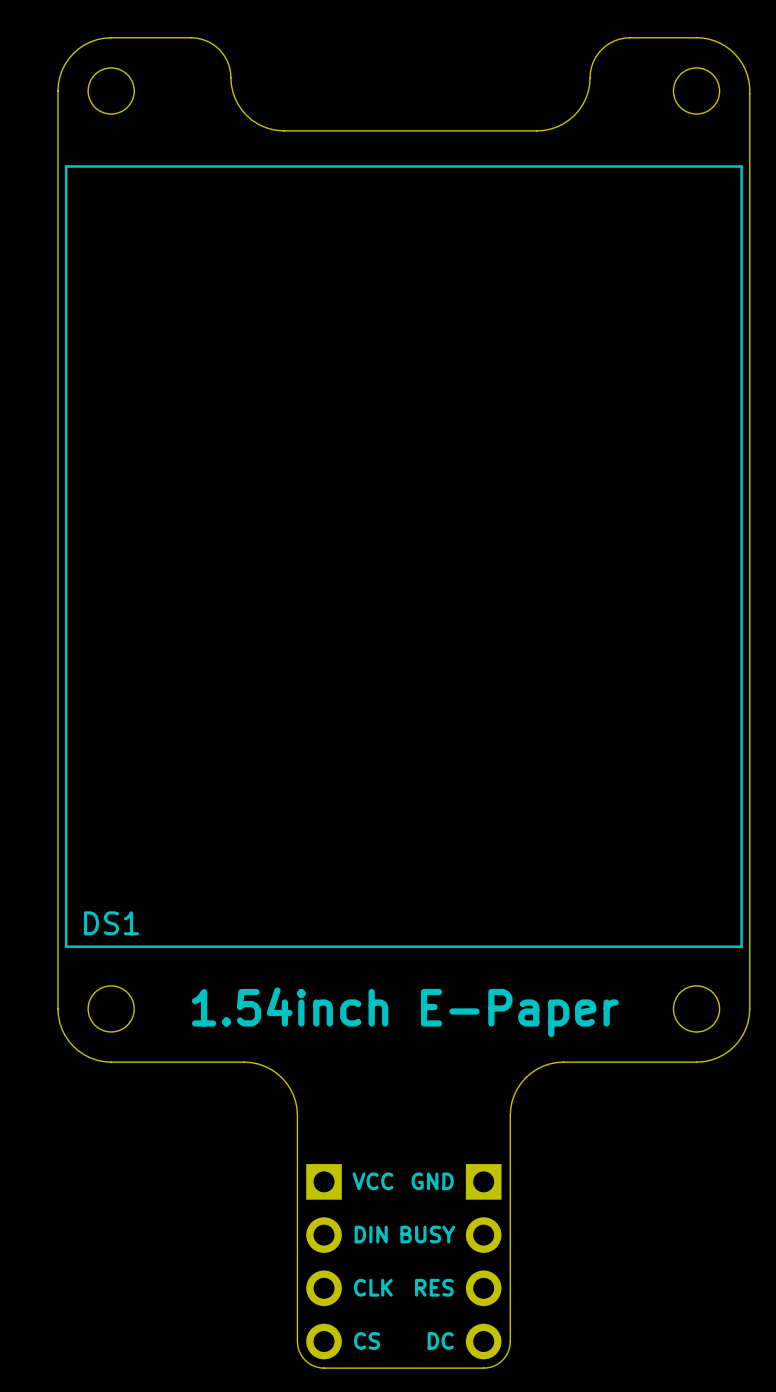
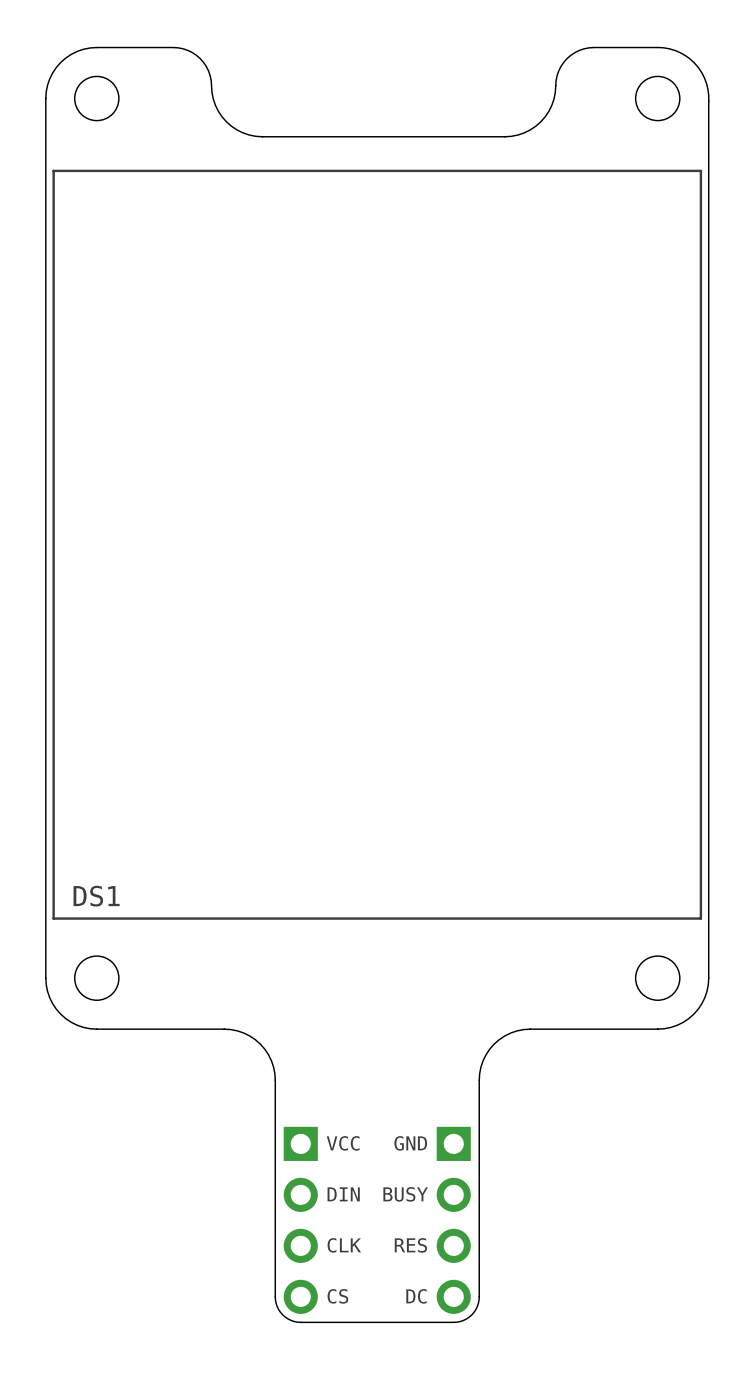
text: 1.54inch E-Paper (405, 1012) -> none

